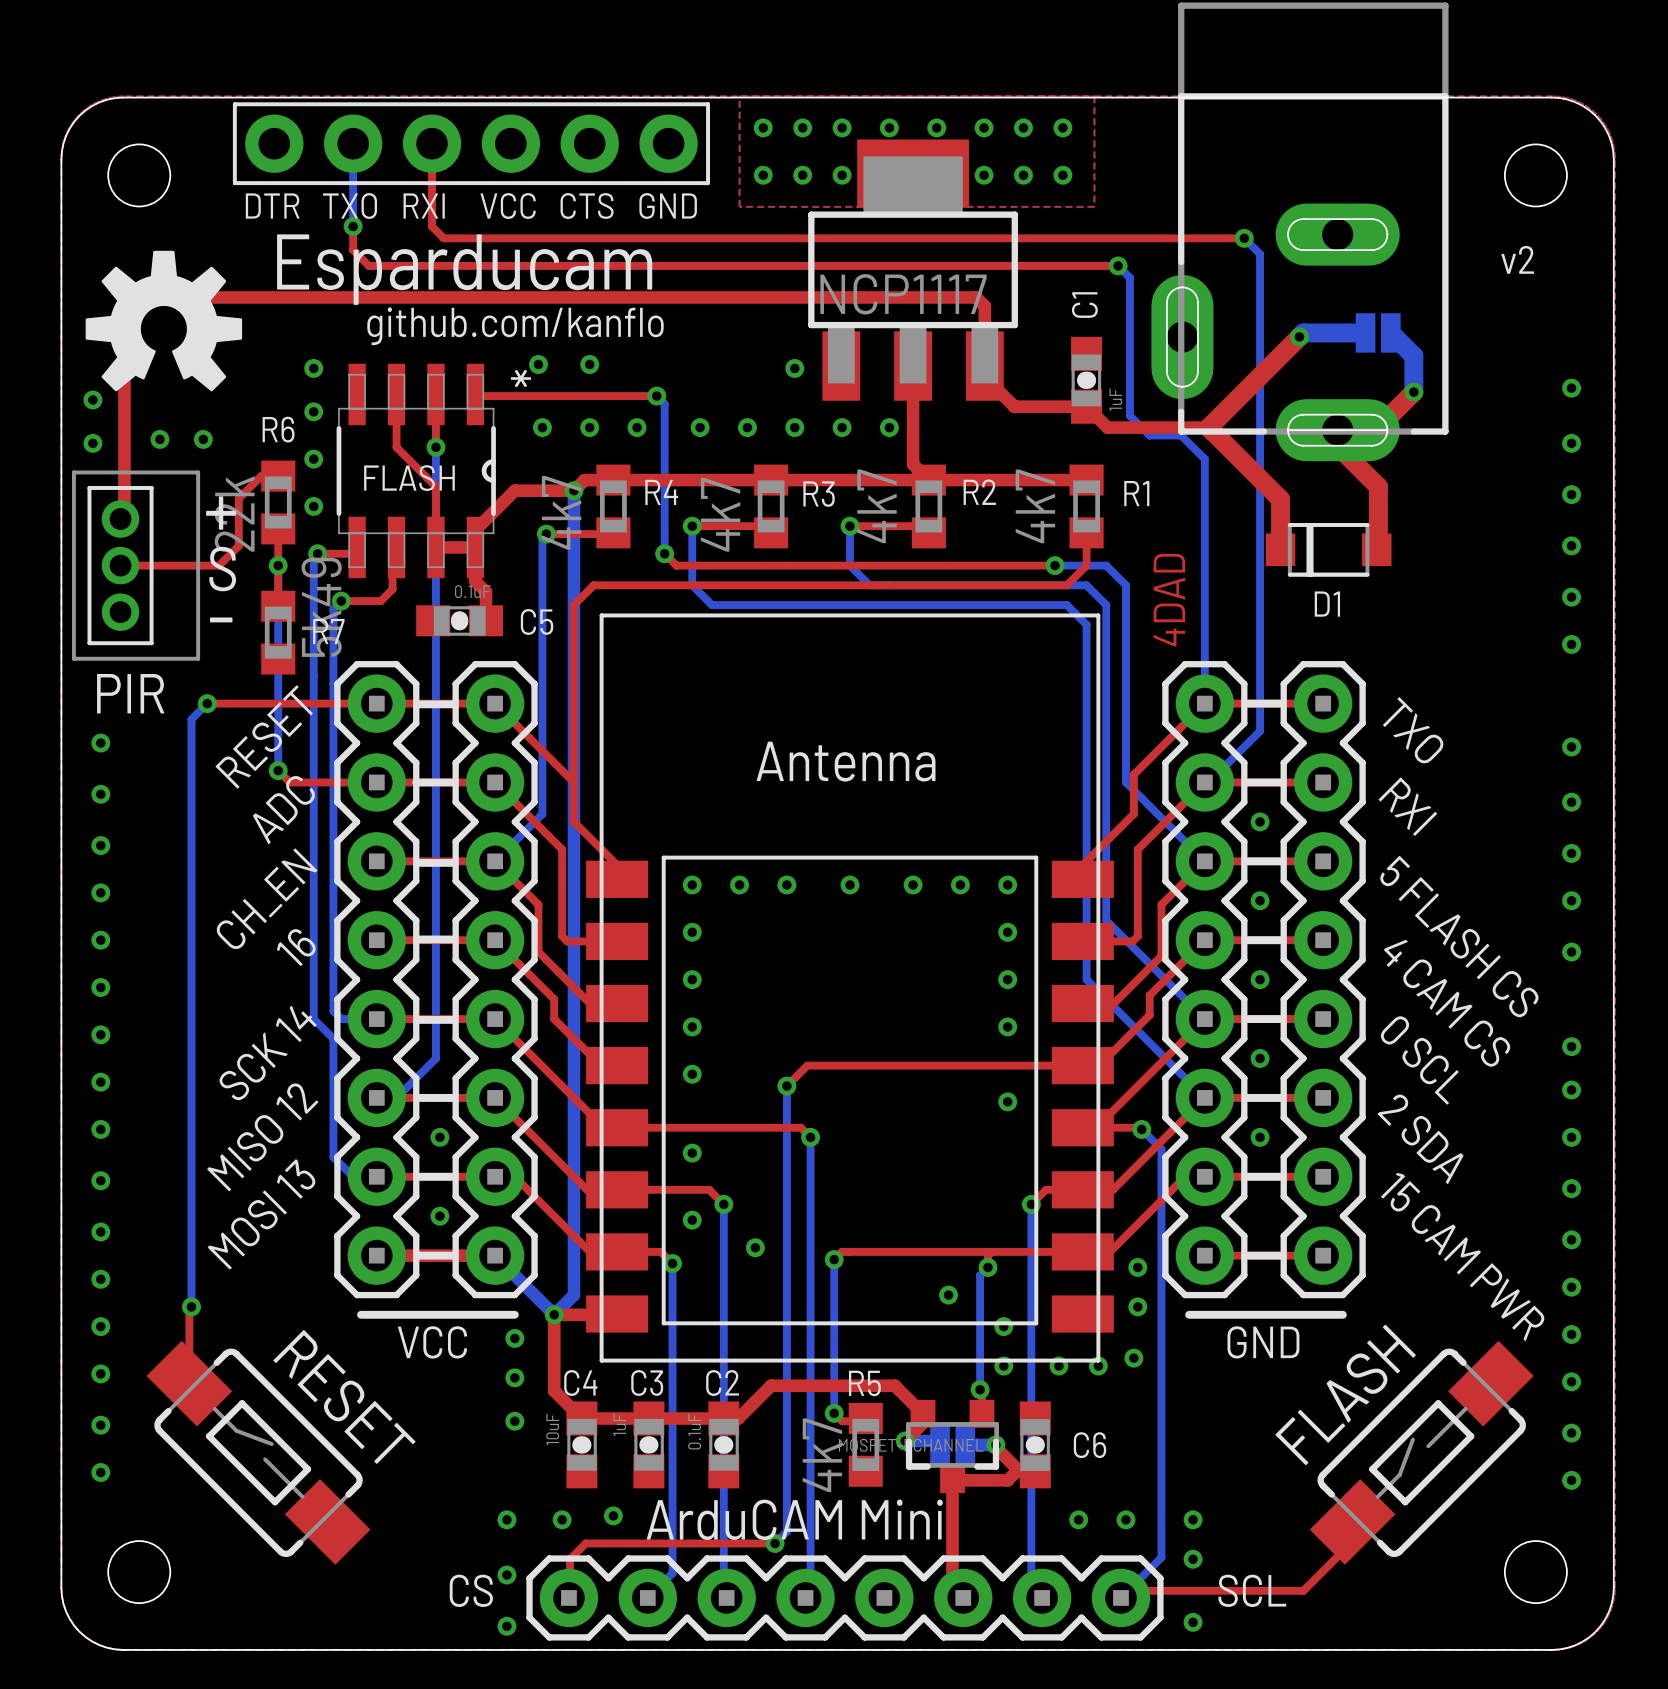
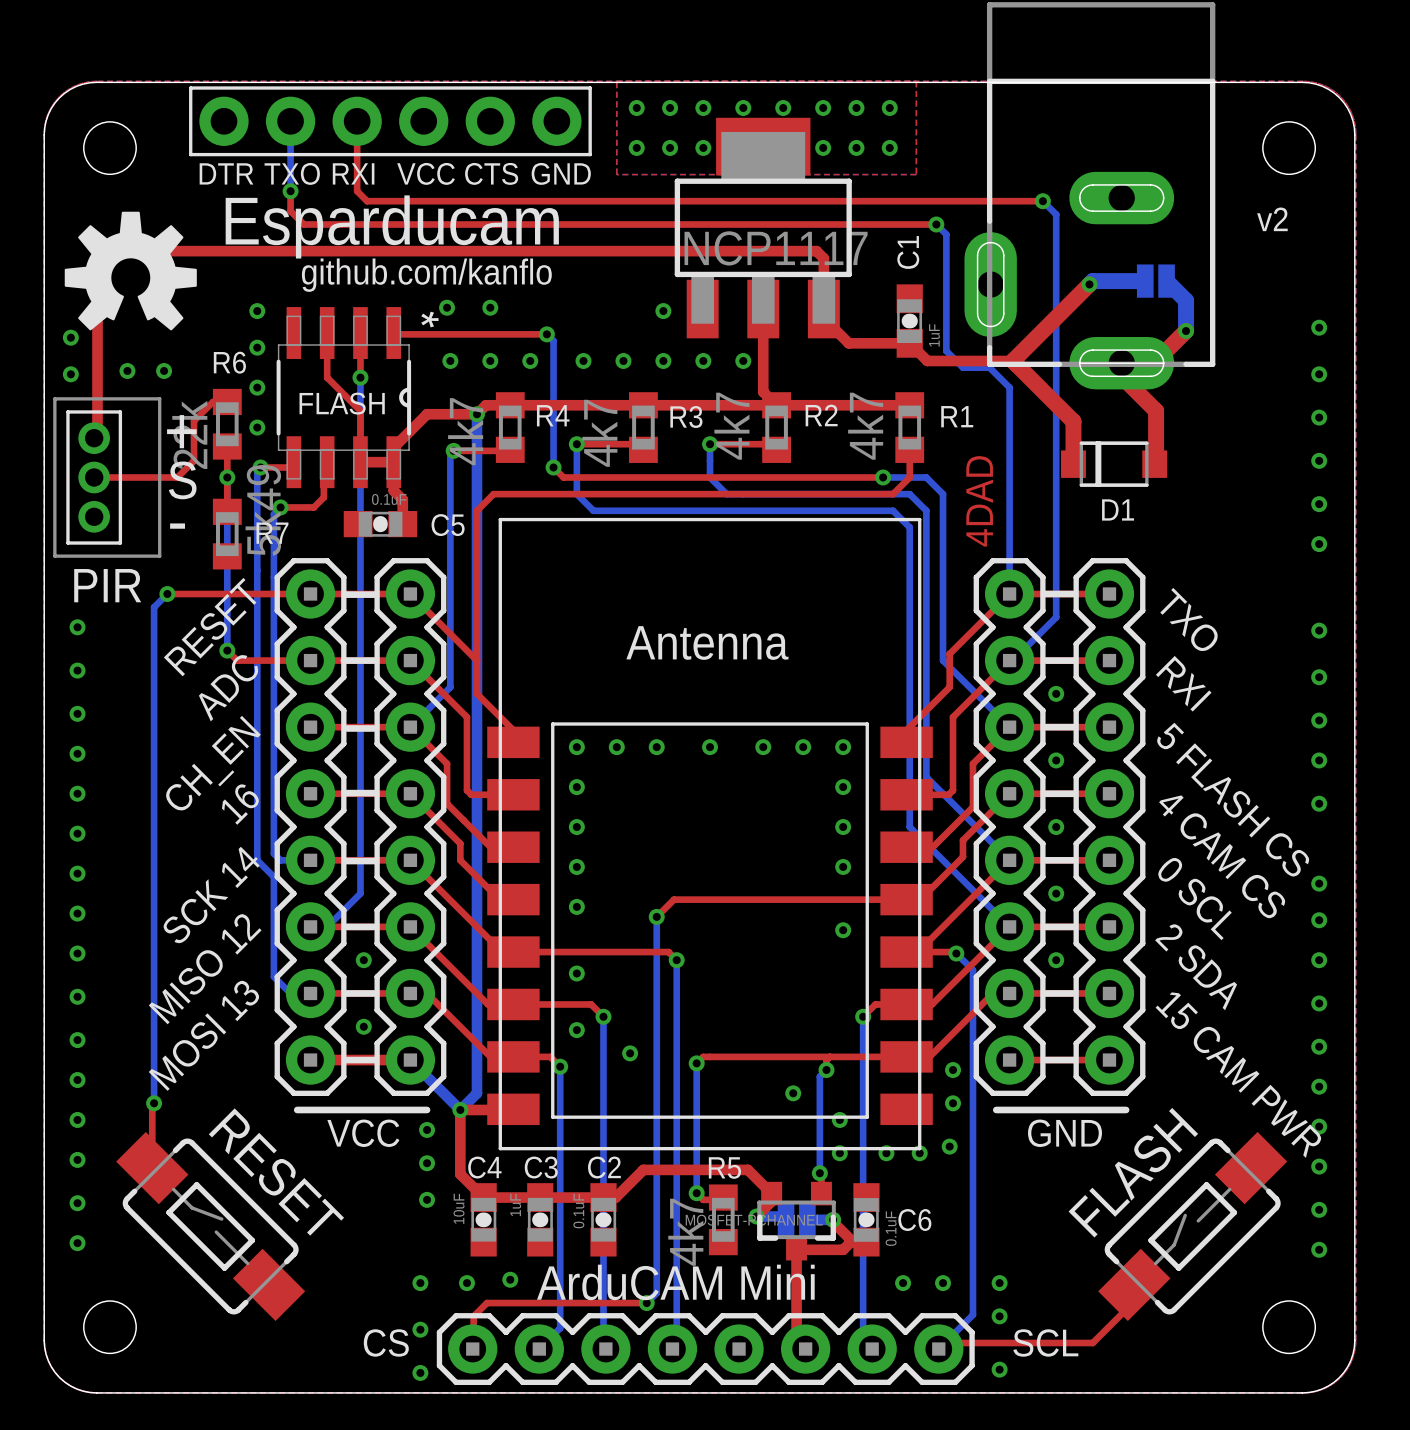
part value: none -> 0.1uF (891, 1228)

